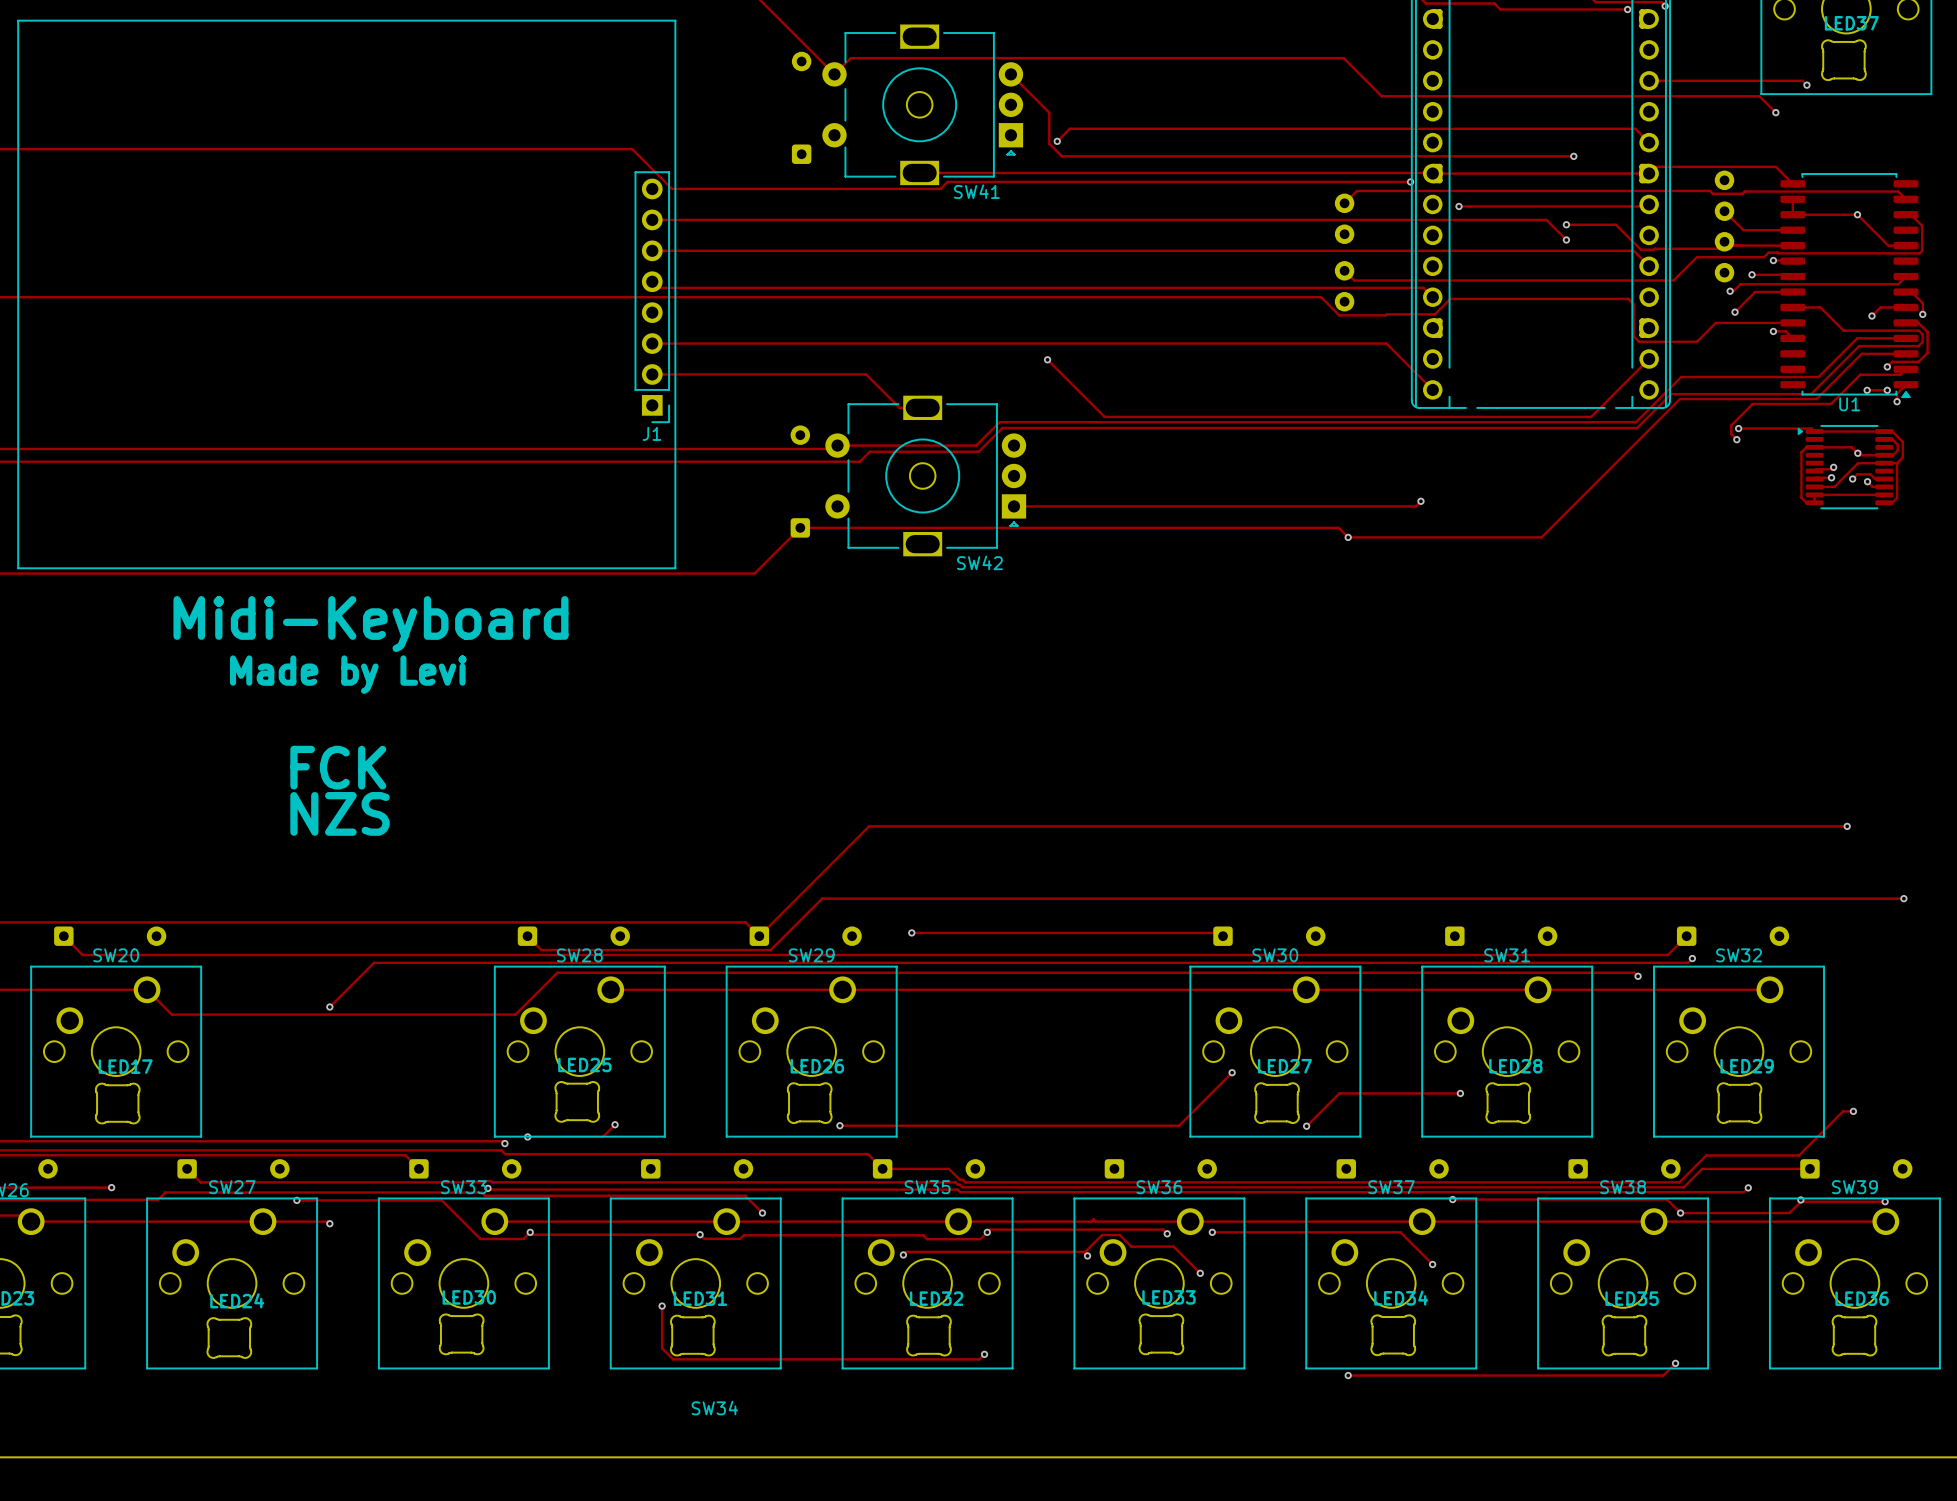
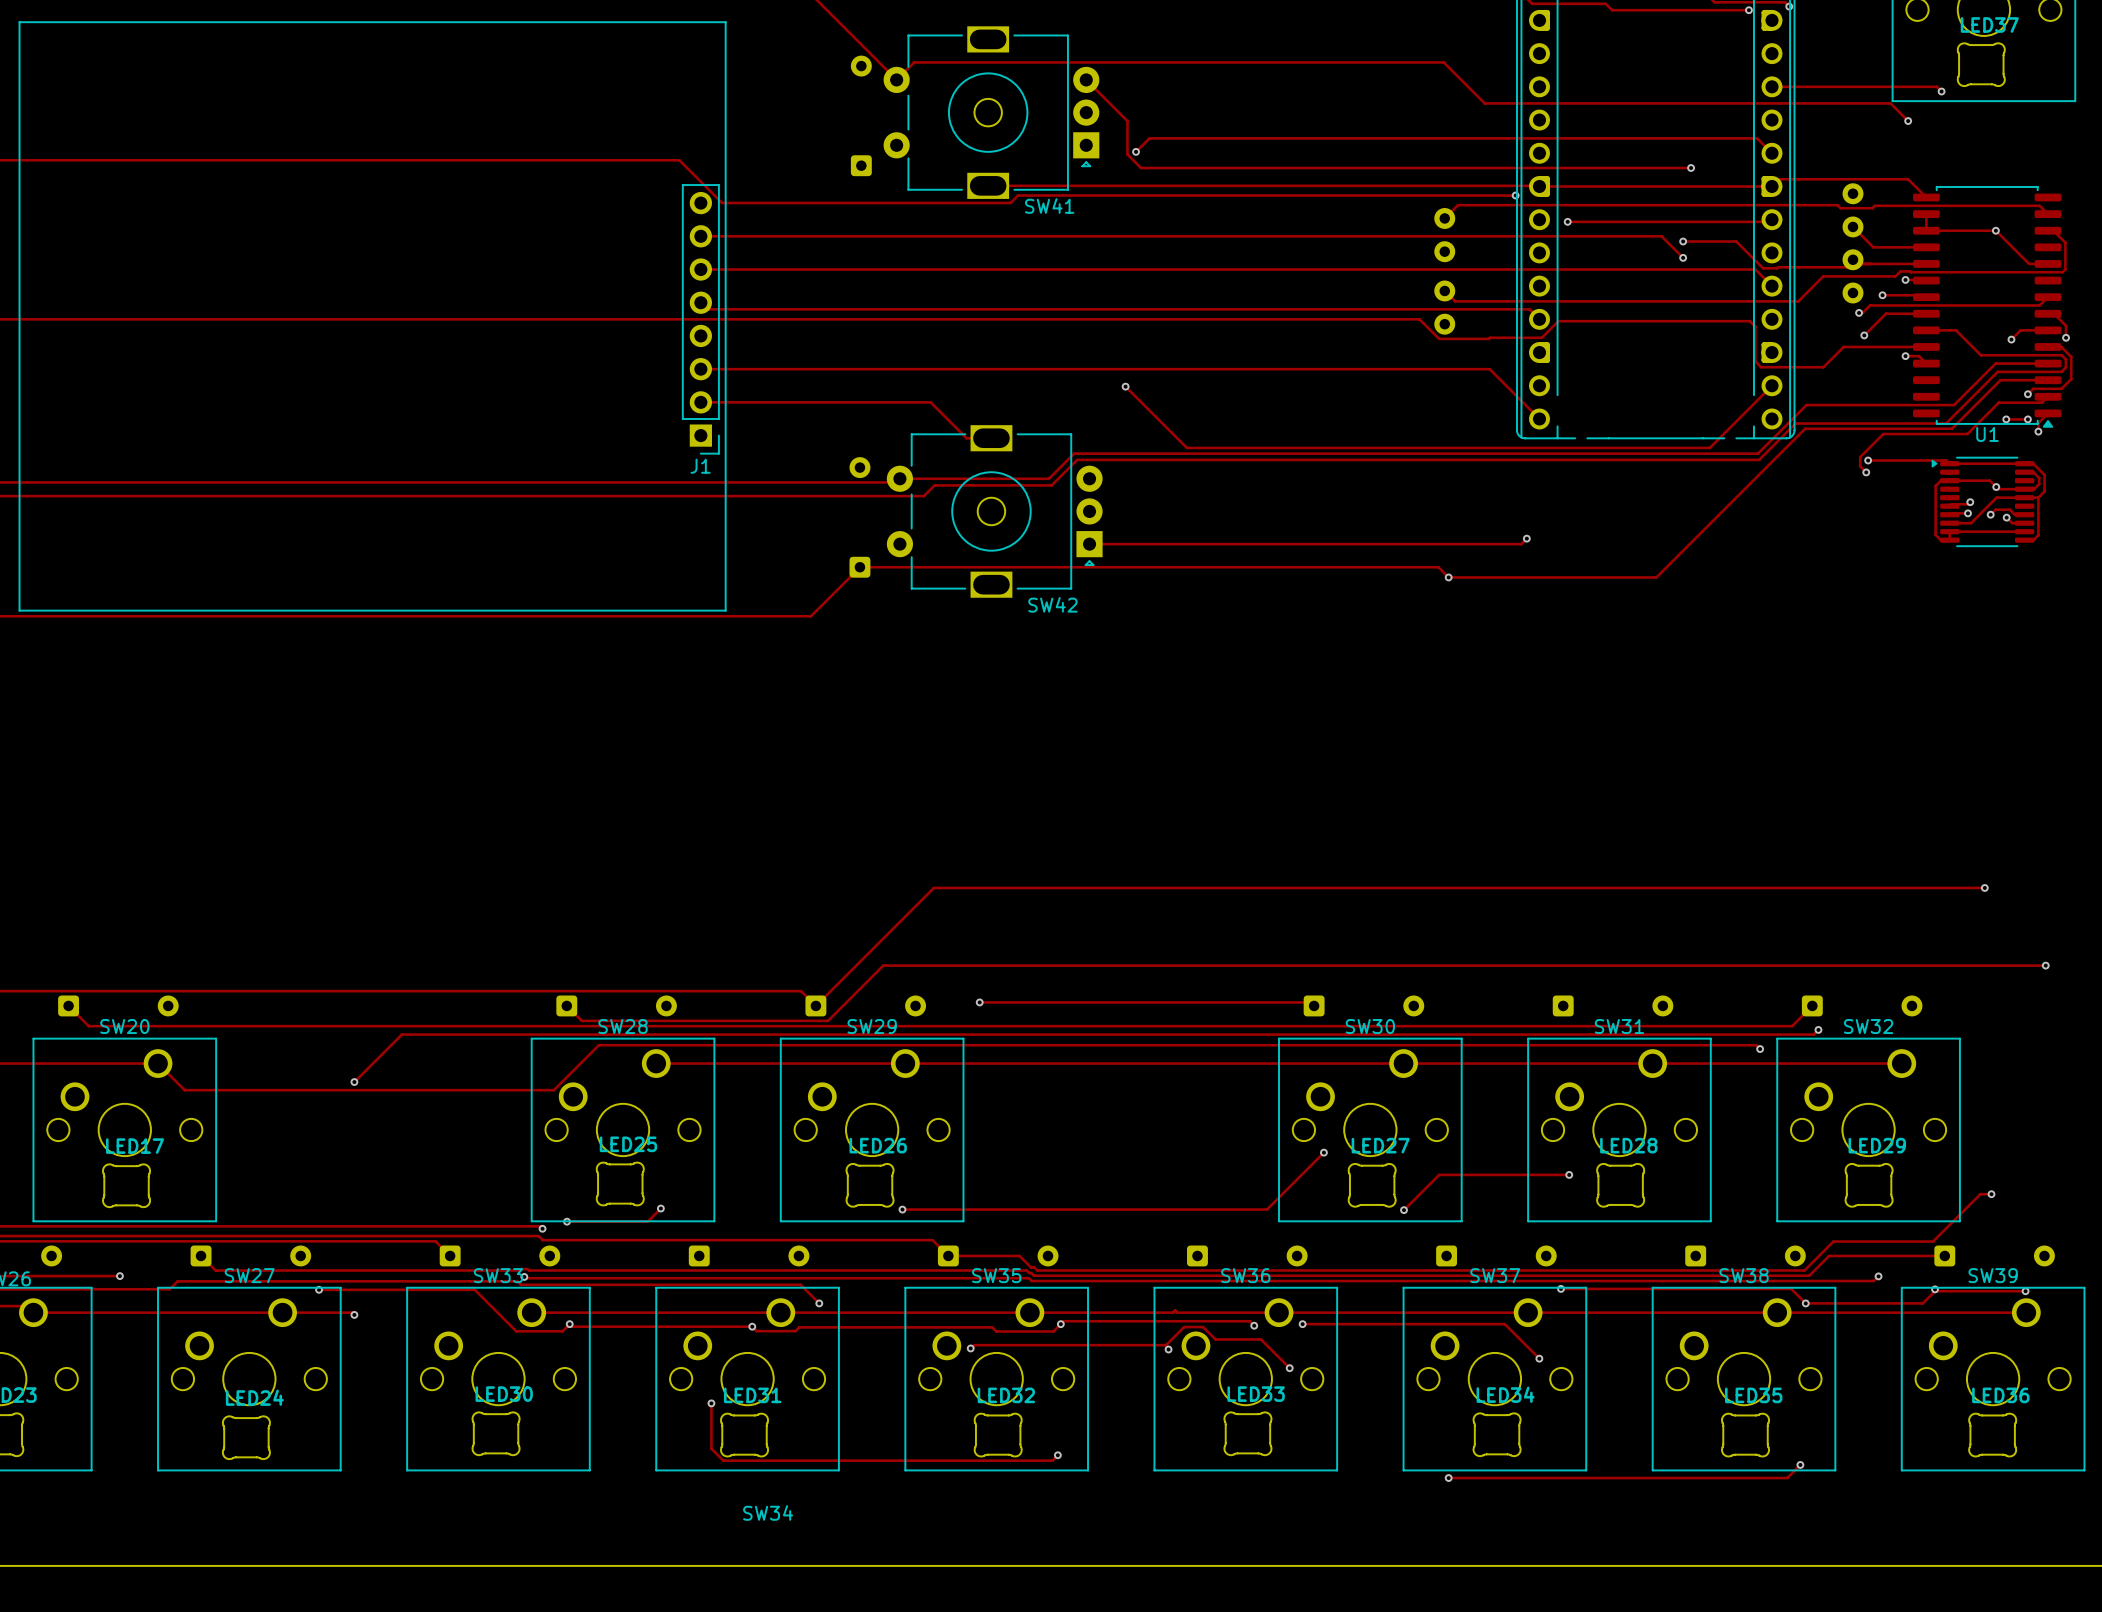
text: Midi-Keyboard (370, 624) -> none
text: Made by Levi (348, 674) -> none
text: FCK (338, 767) -> none
text: NZS (340, 813) -> none

